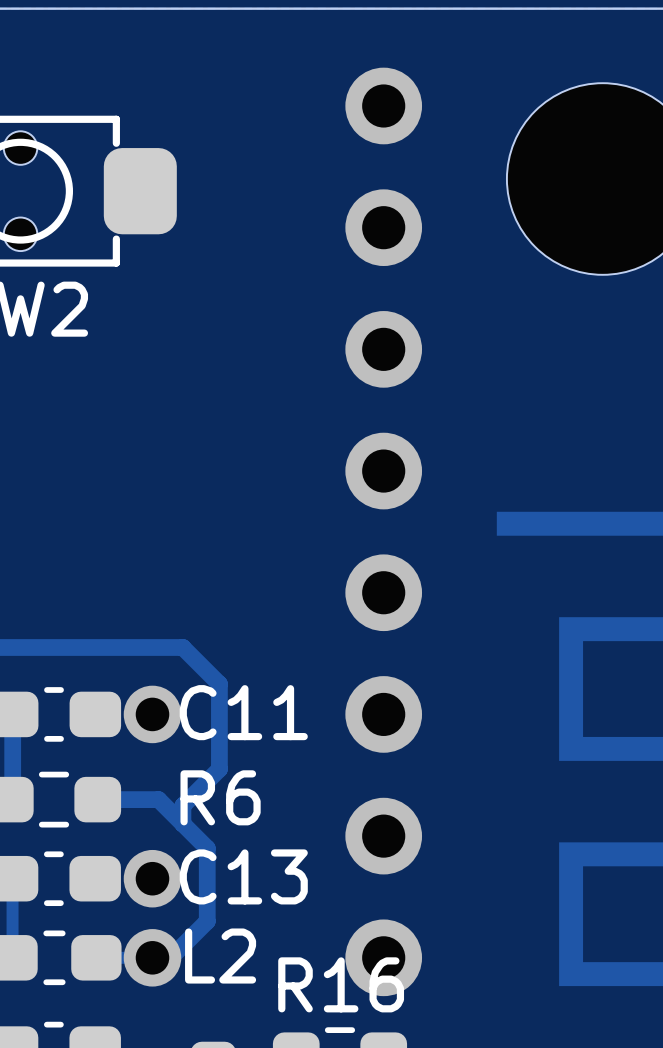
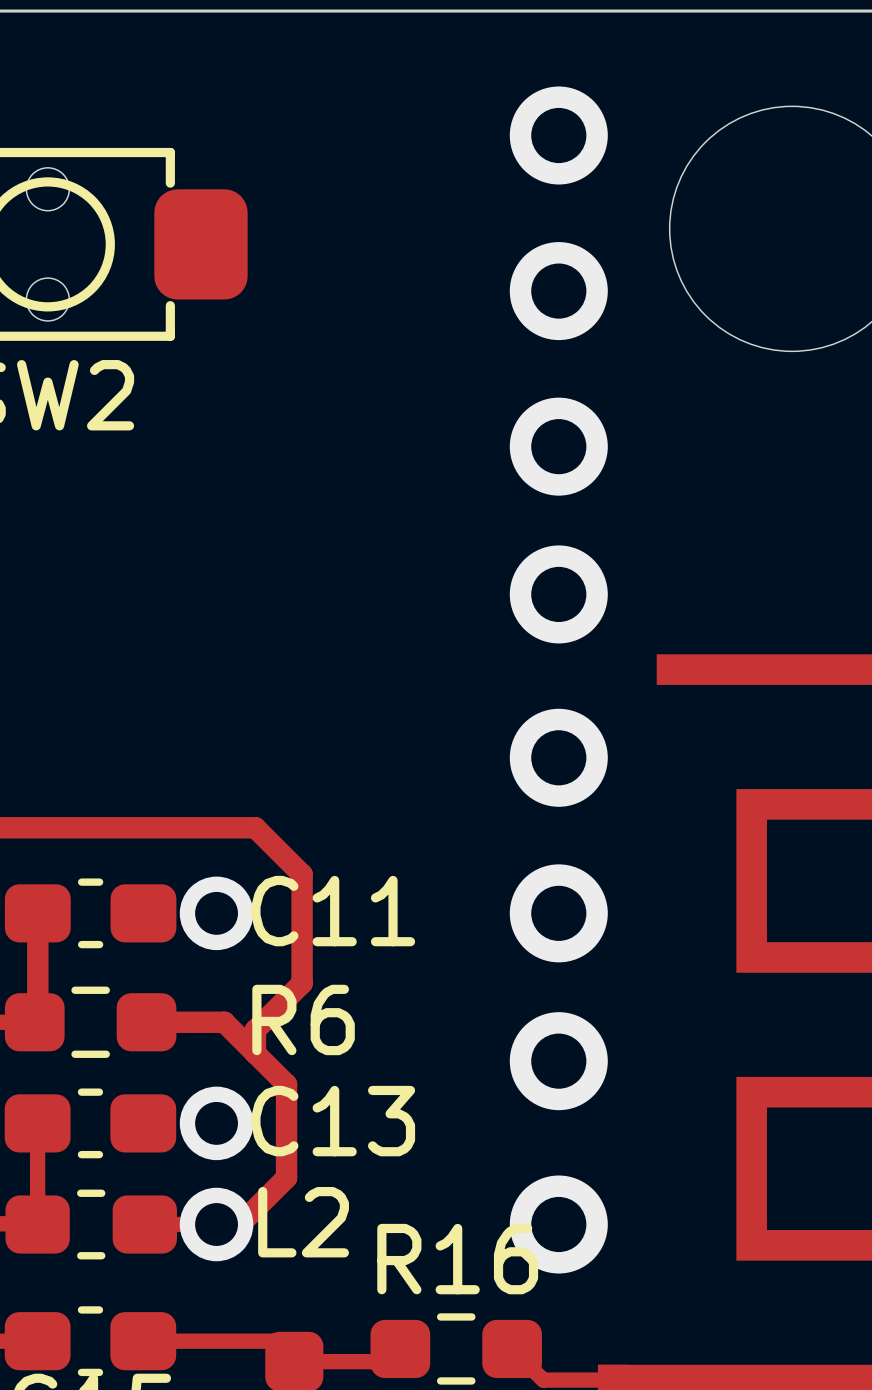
via position: (383, 105) -> (558, 135)
via position: (383, 227) -> (558, 291)
via position: (383, 349) -> (558, 446)
via position: (383, 471) -> (558, 594)
via position: (383, 592) -> (558, 757)
via position: (383, 714) -> (558, 913)
via position: (383, 836) -> (558, 1061)
via position: (383, 957) -> (558, 1224)

